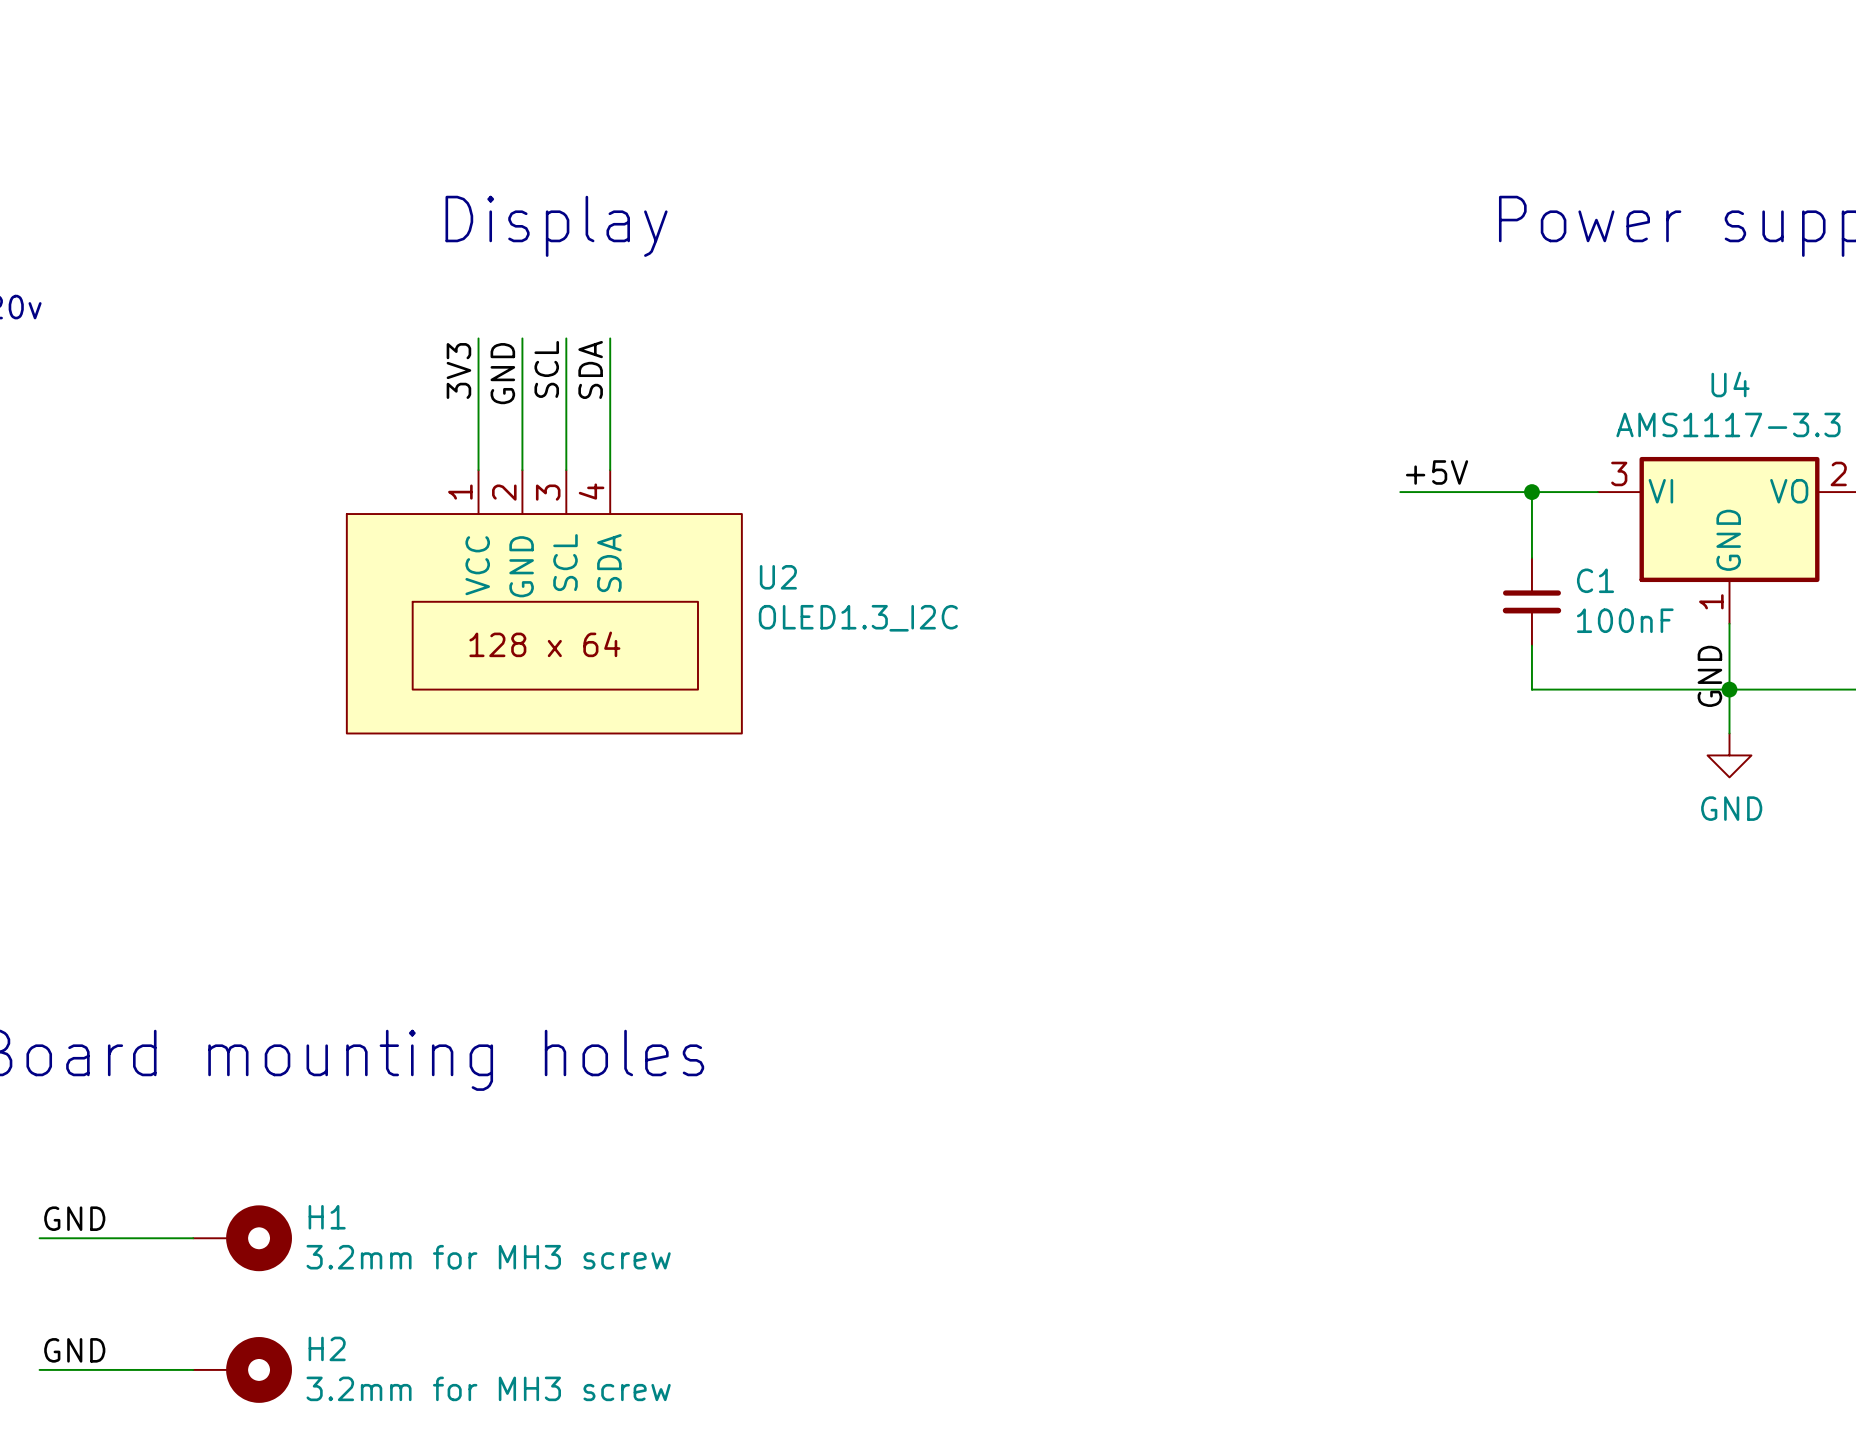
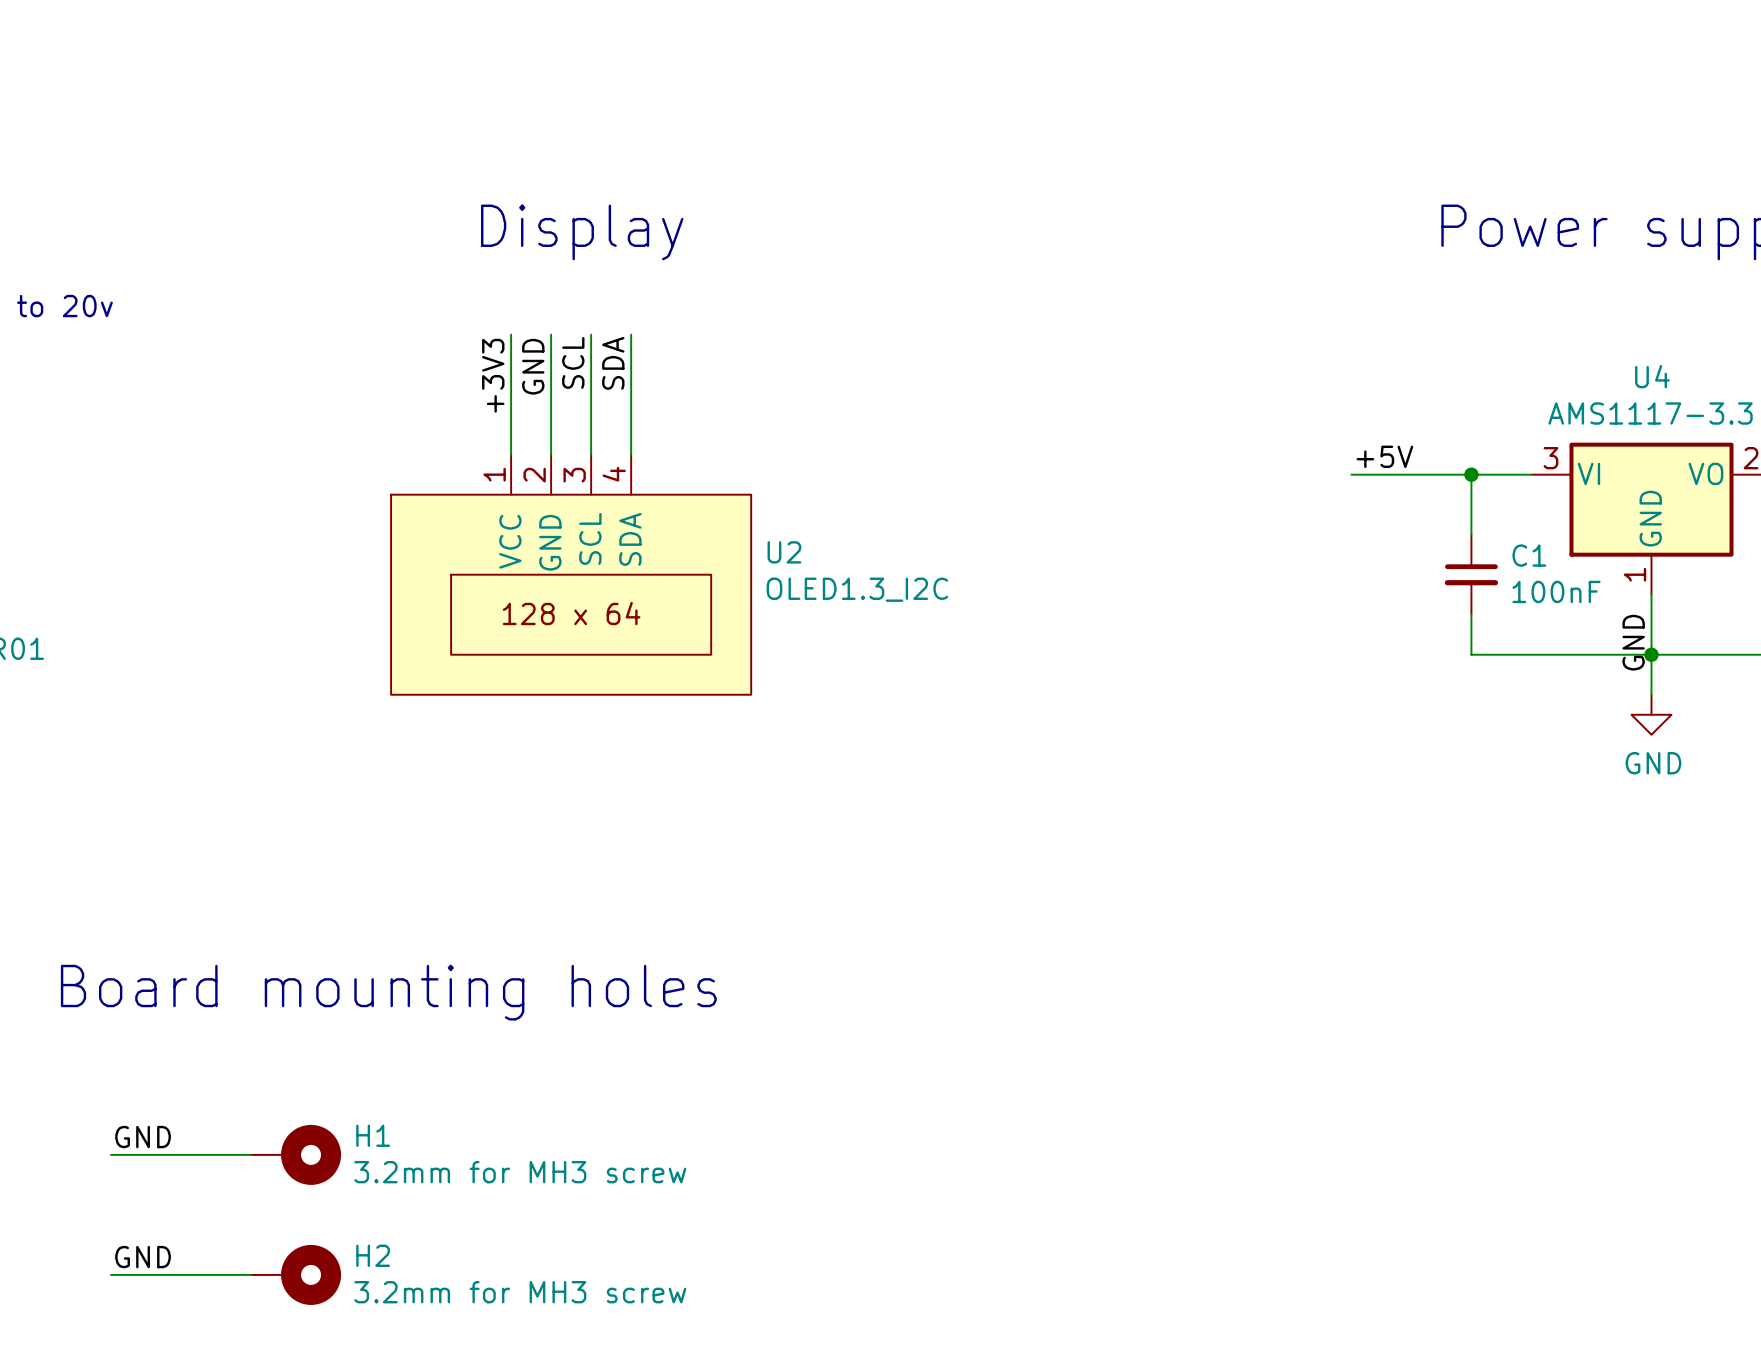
label: 3V3 (458, 371) -> +3V3 (493, 375)

